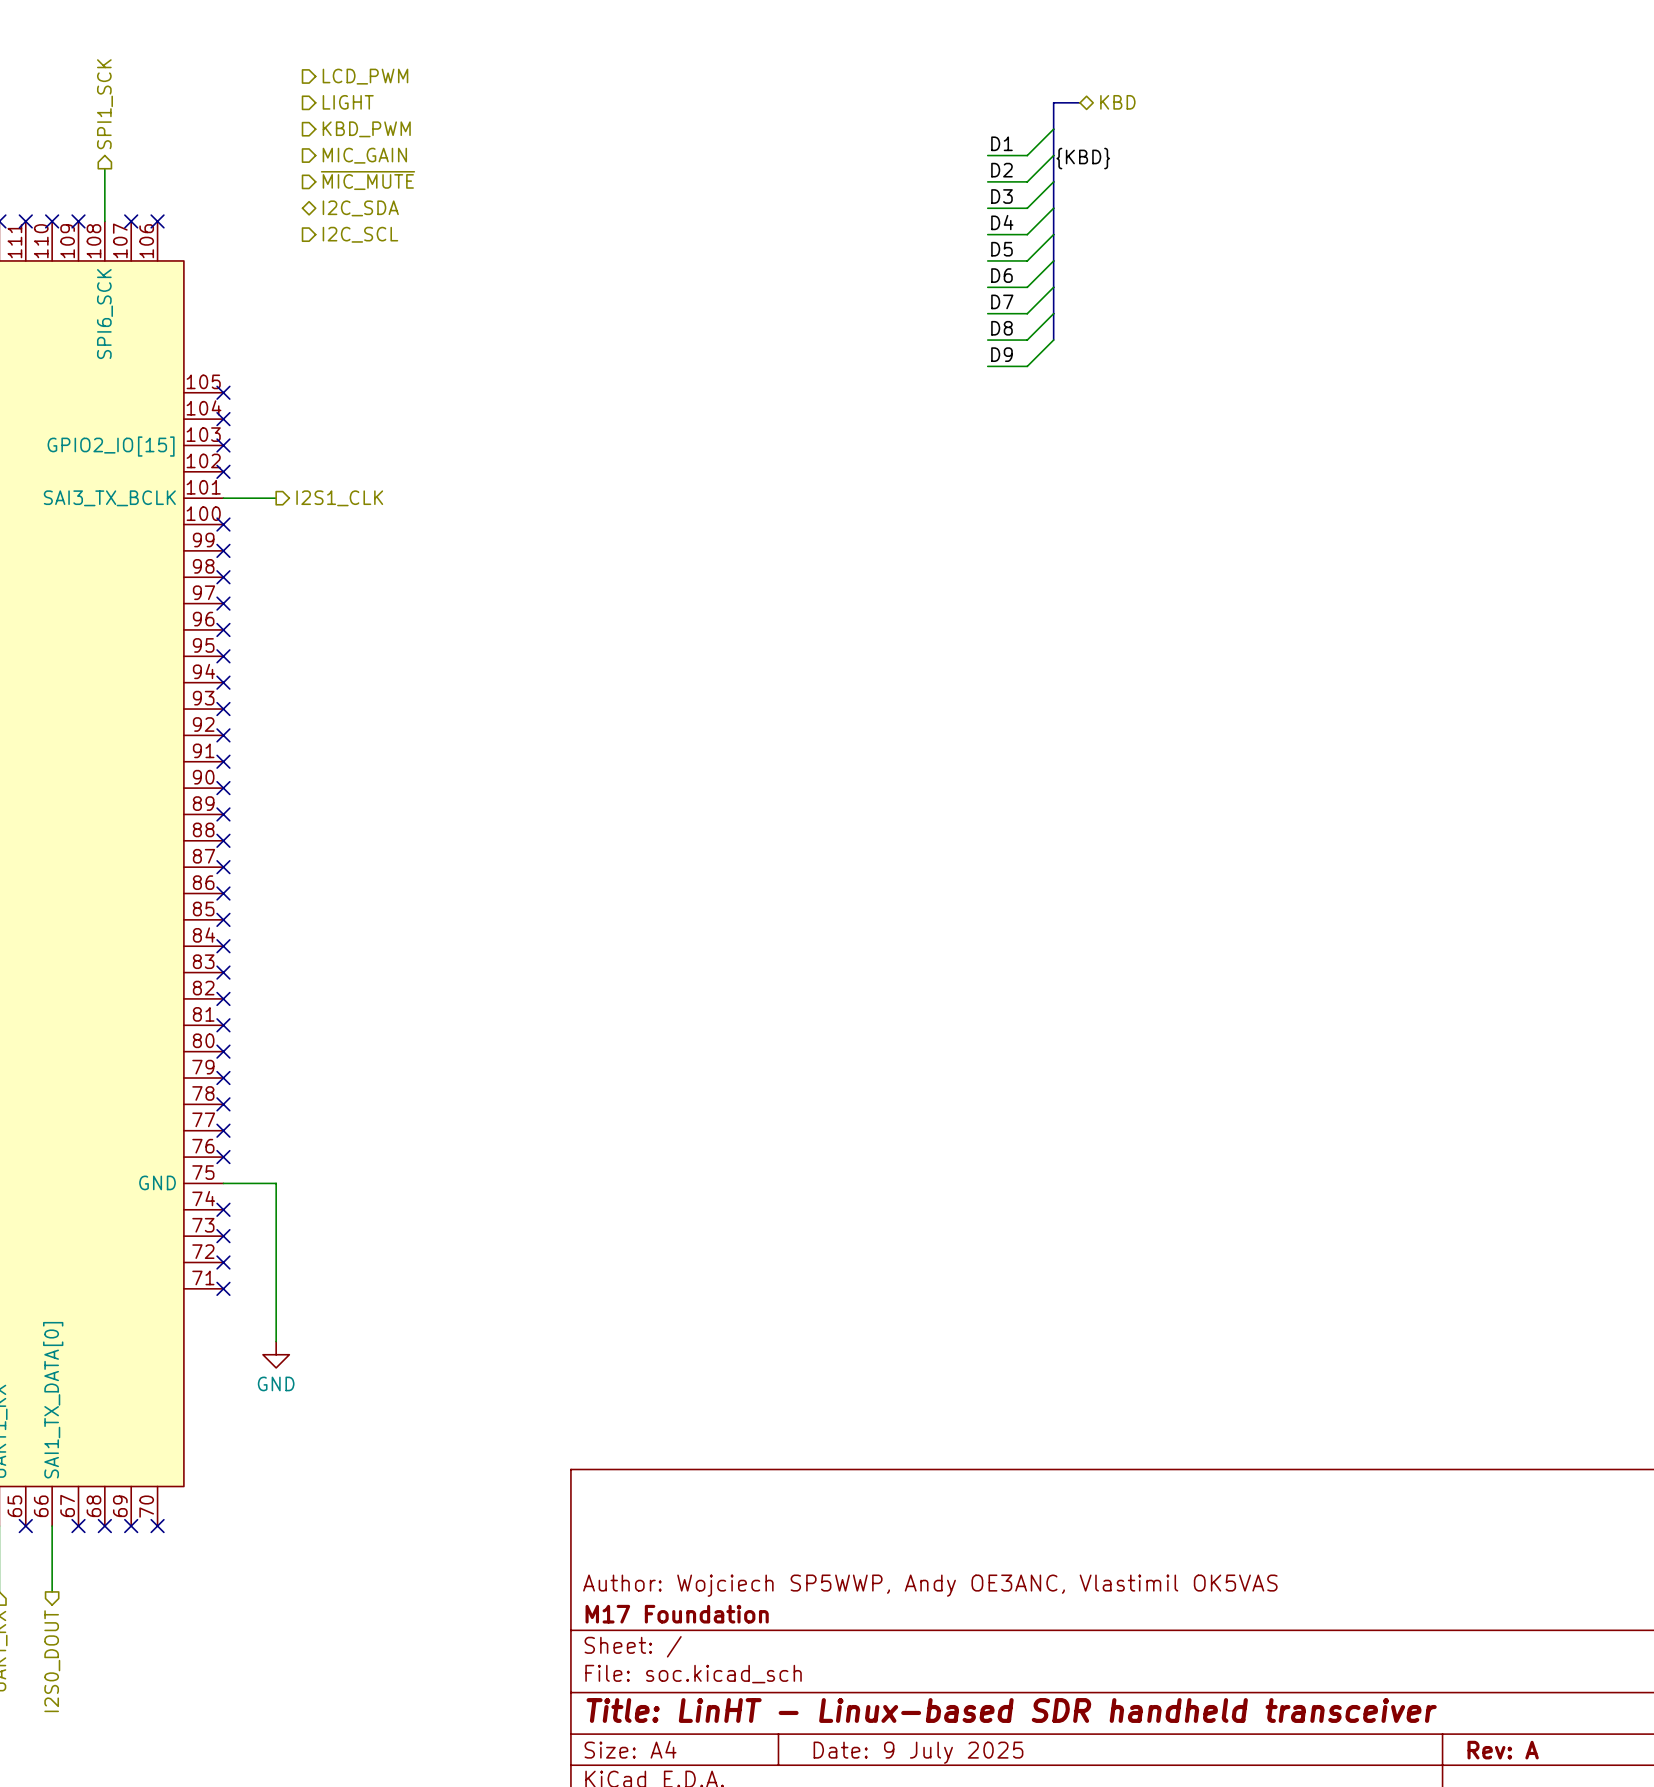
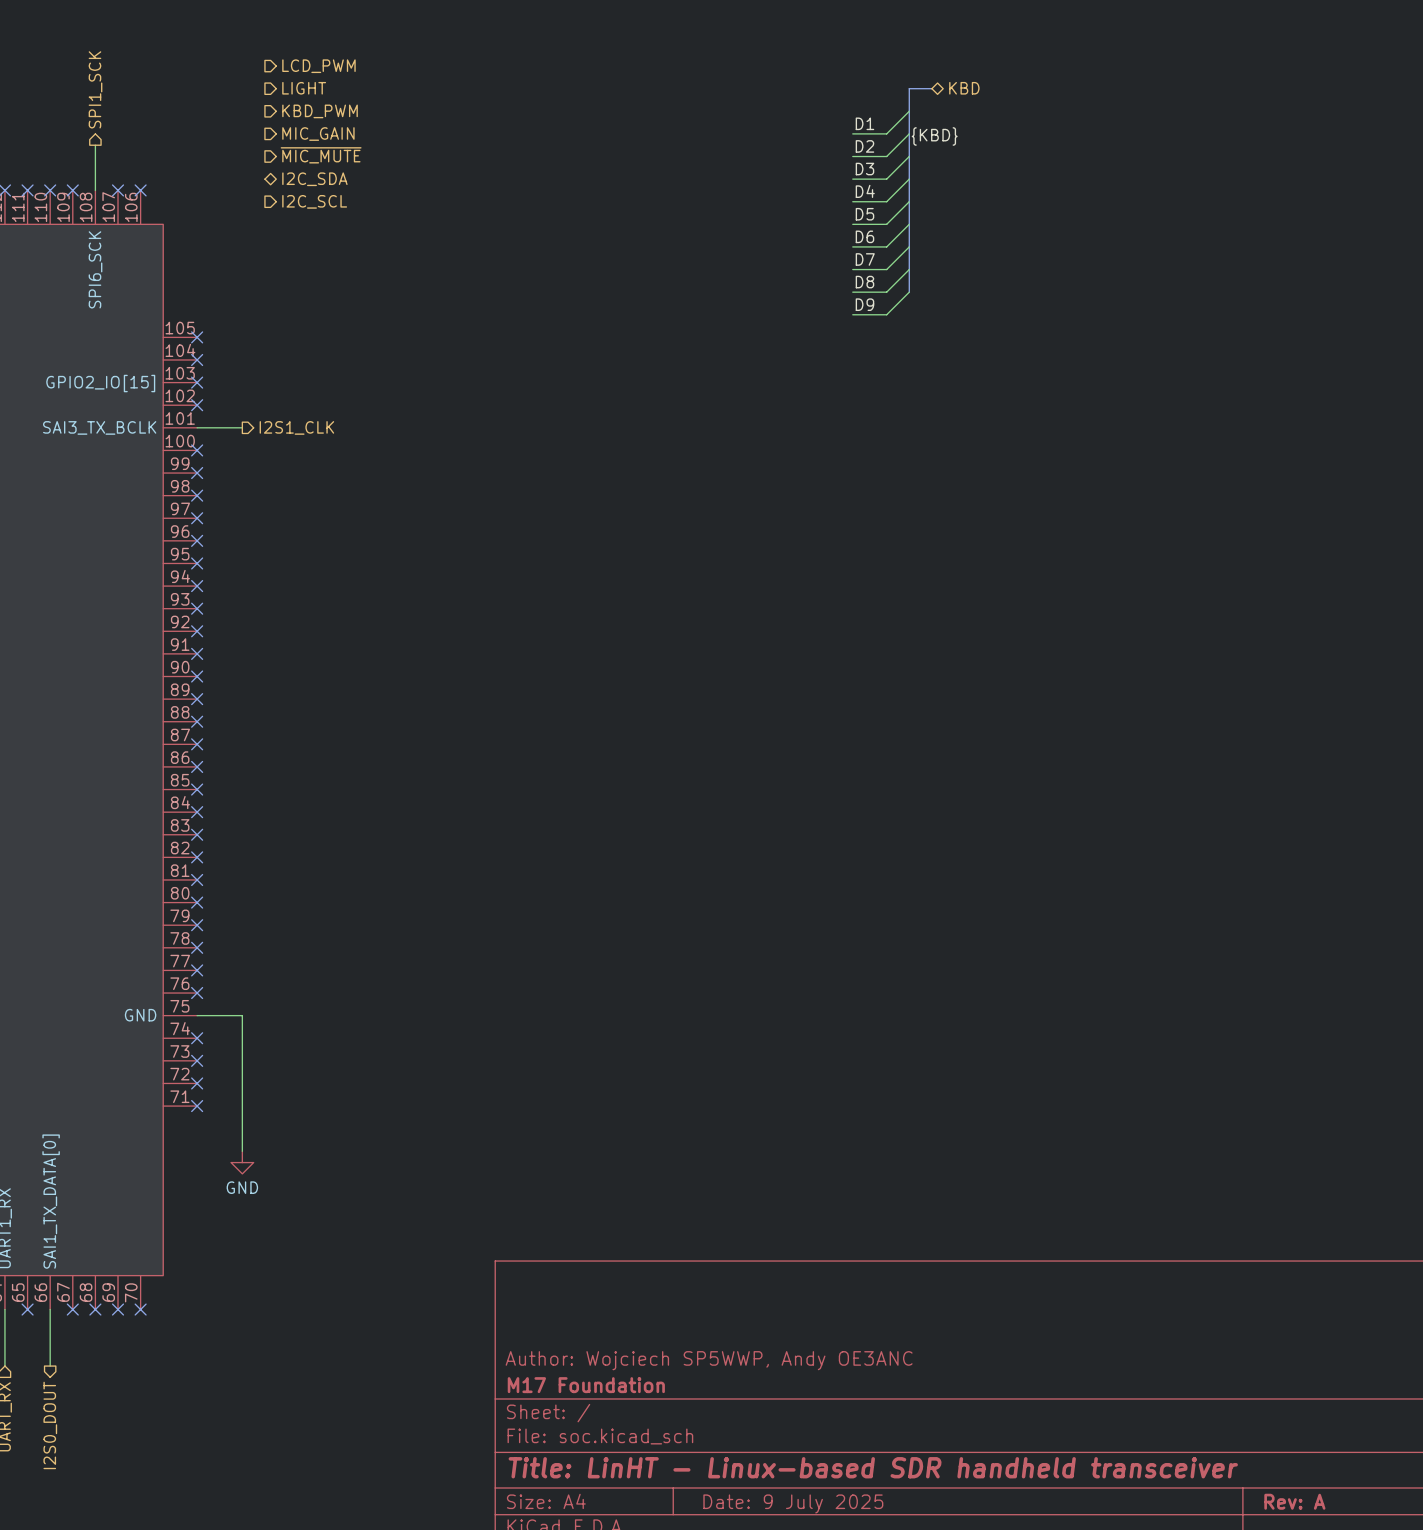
title block: Author: Wojciech SP5WWP, Andy OE3ANC, Vlastimil OK5VAS (930, 1585) -> Author: Wojciech SP5WWP, Andy OE3ANC (709, 1360)

